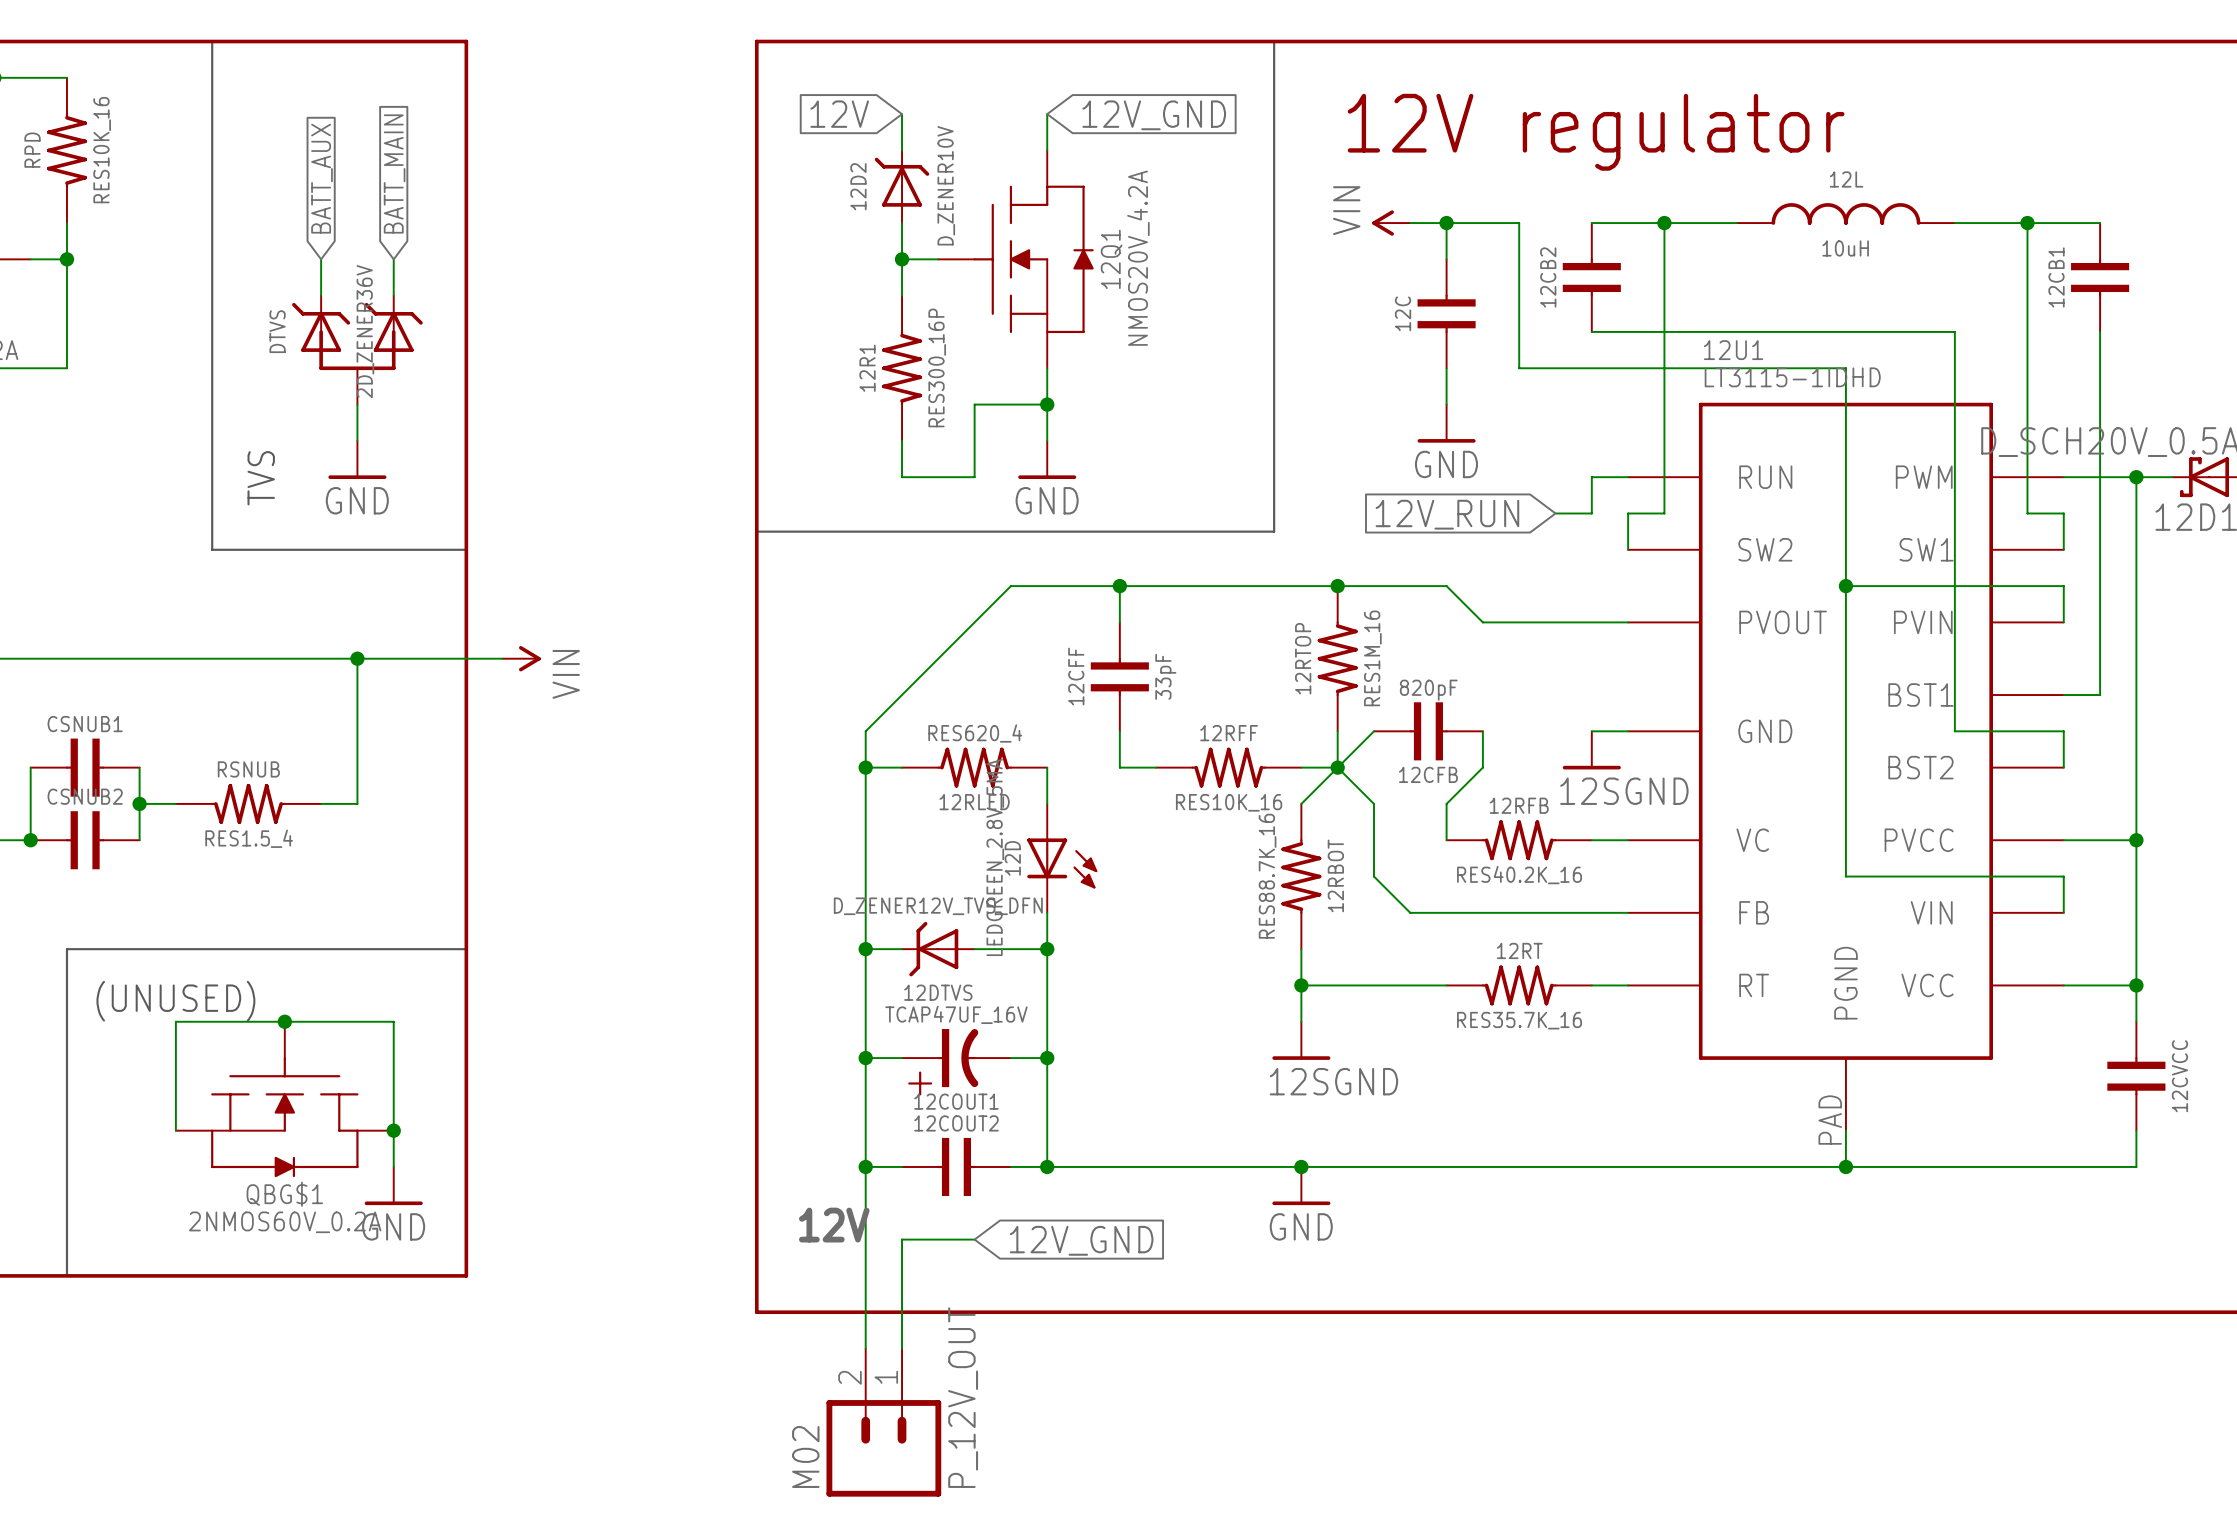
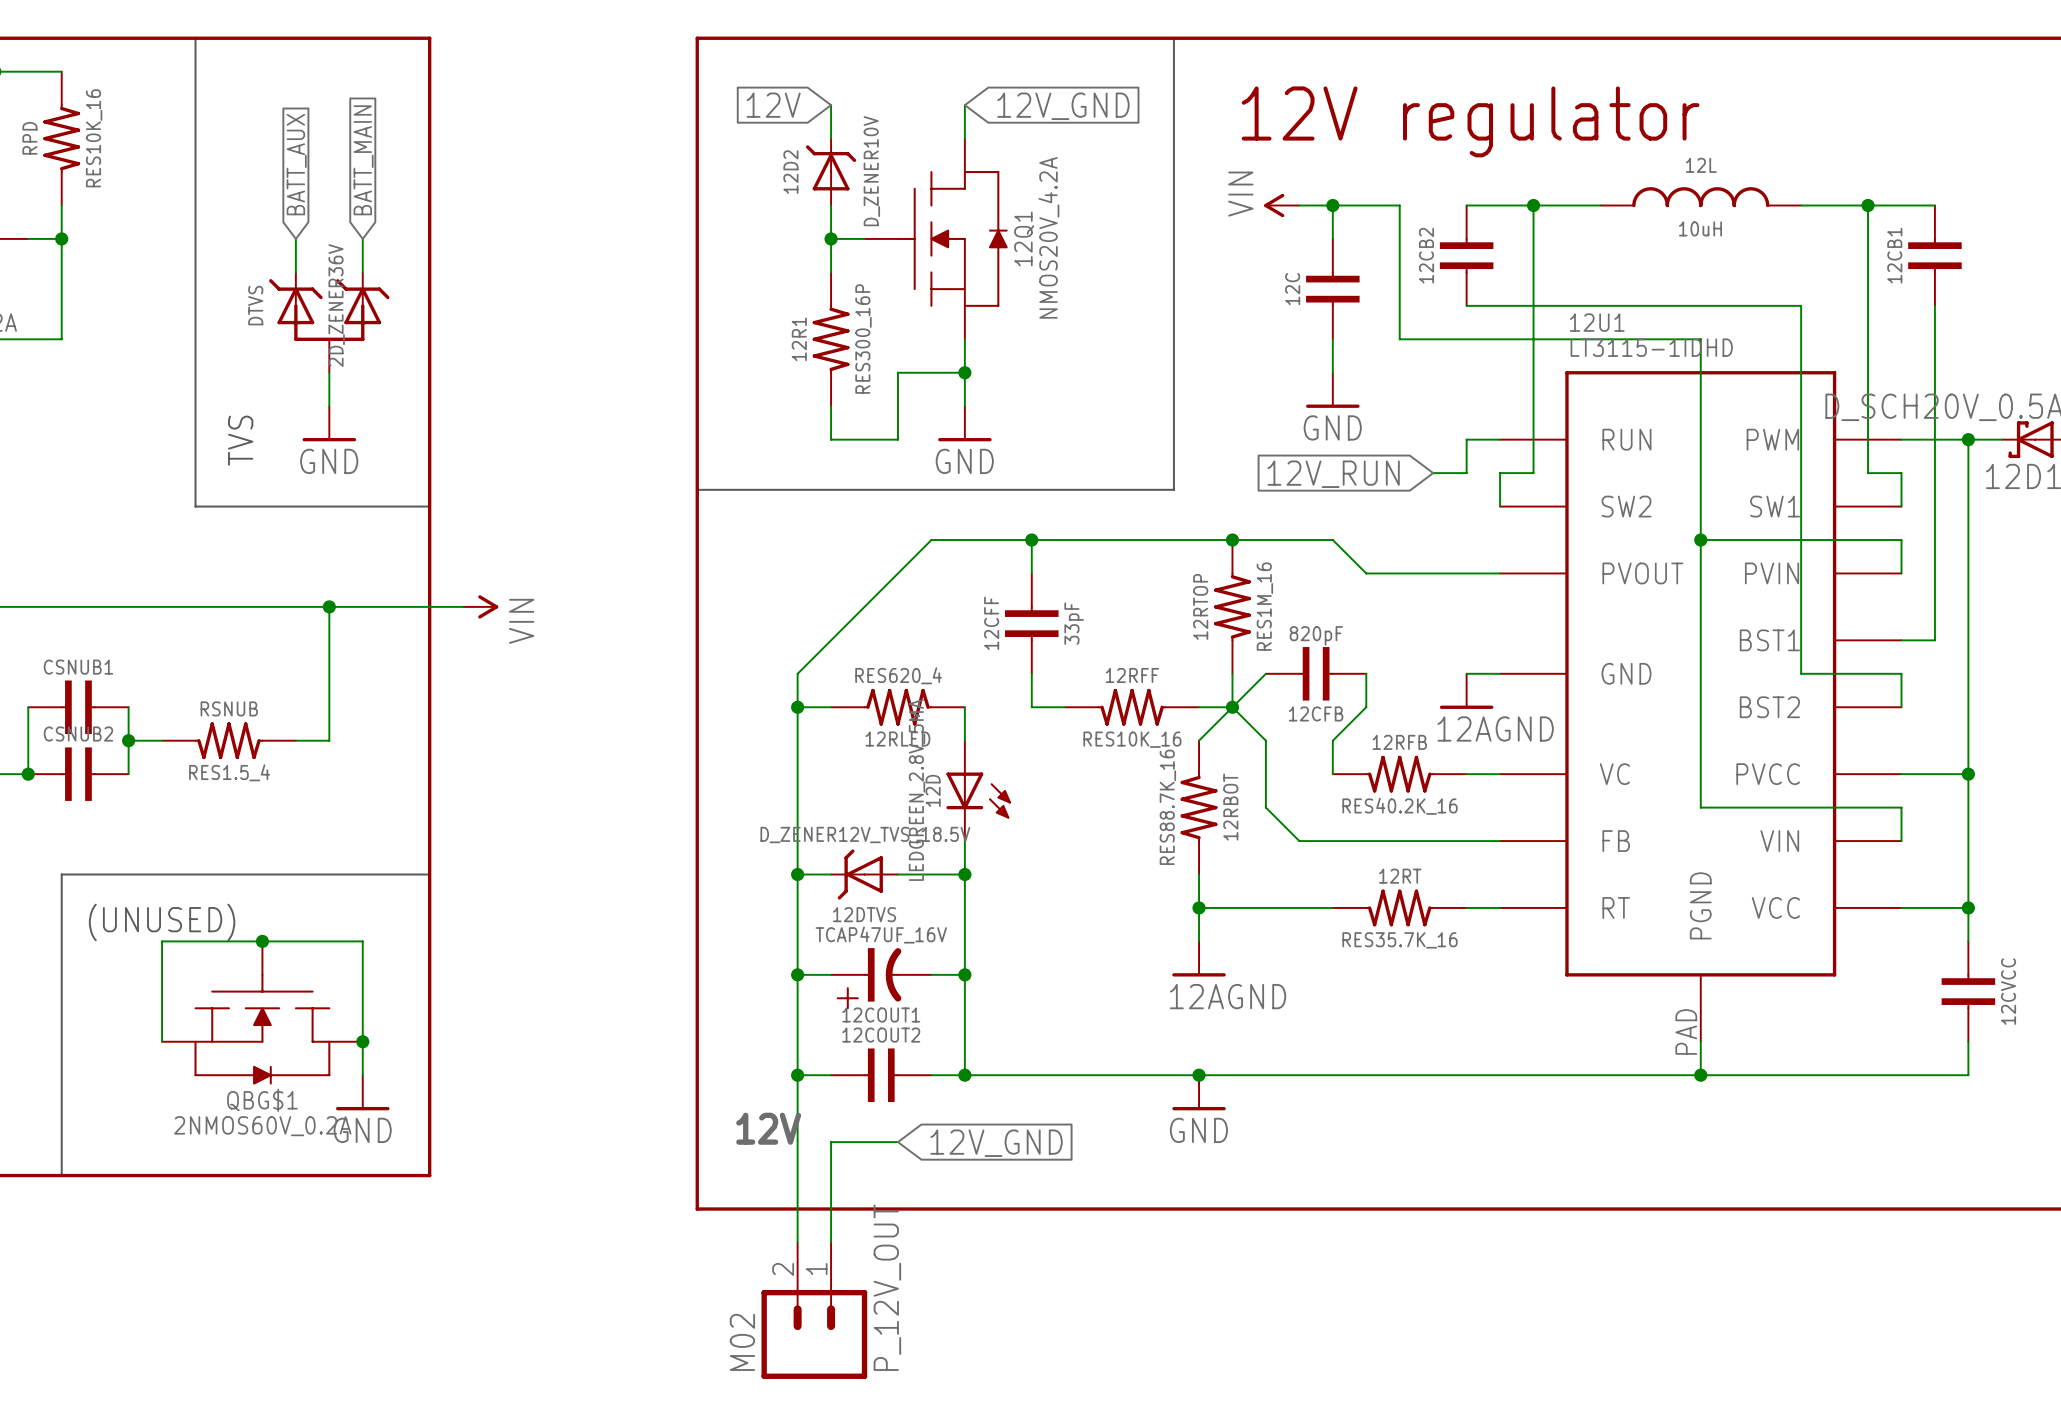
power symbol: 12SGND (1591, 750) -> 12AGND (1466, 691)
12DTVS value: D_ZENER12V_TVS_DFN (938, 906) -> D_ZENER12V_TVS_18.5V (865, 835)
power symbol: 12SGND (1301, 1040) -> 12AGND (1199, 958)

